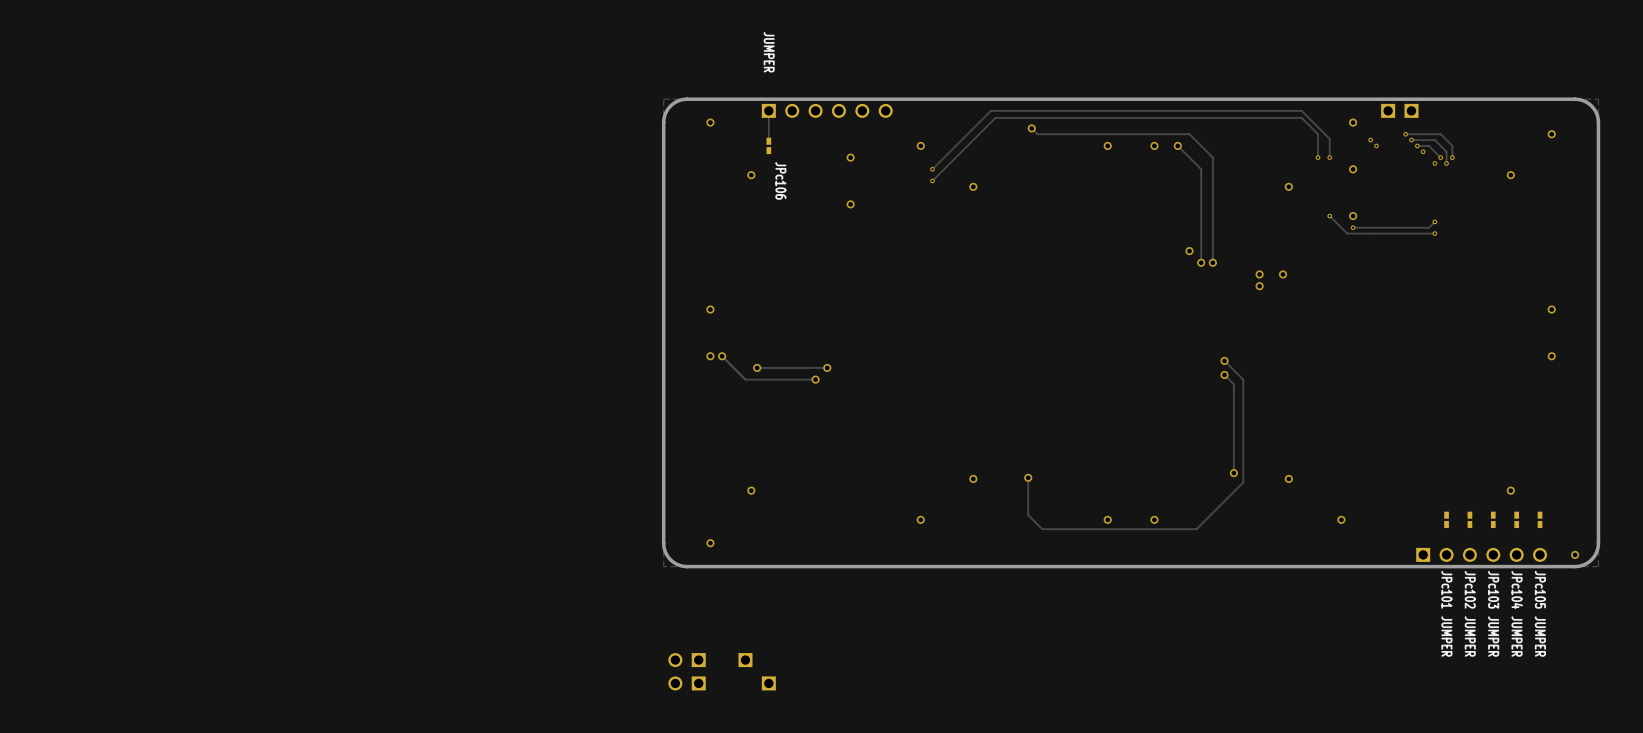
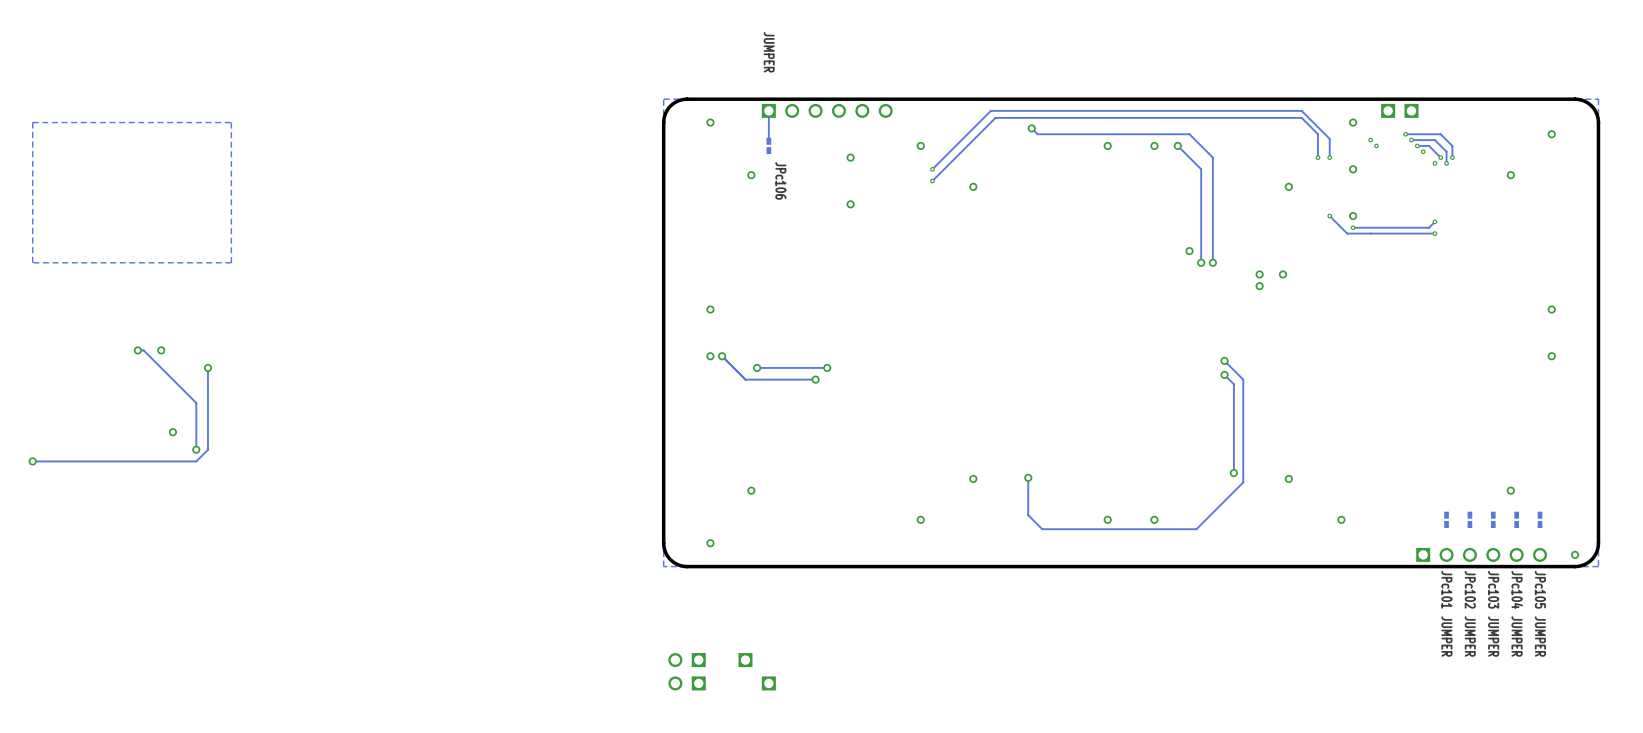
zone outline: none -> (231, 122) (32, 122) (32, 262) (231, 262) (231, 122)
track: none -> (137, 350) (143, 350) (196, 403) (196, 449)
via: none -> (137, 350)
via: none -> (161, 350)
track: none -> (207, 367) (207, 449) (196, 461) (32, 461)
via: none -> (207, 367)
via: none -> (172, 432)
via: none -> (196, 449)
via: none -> (32, 461)

